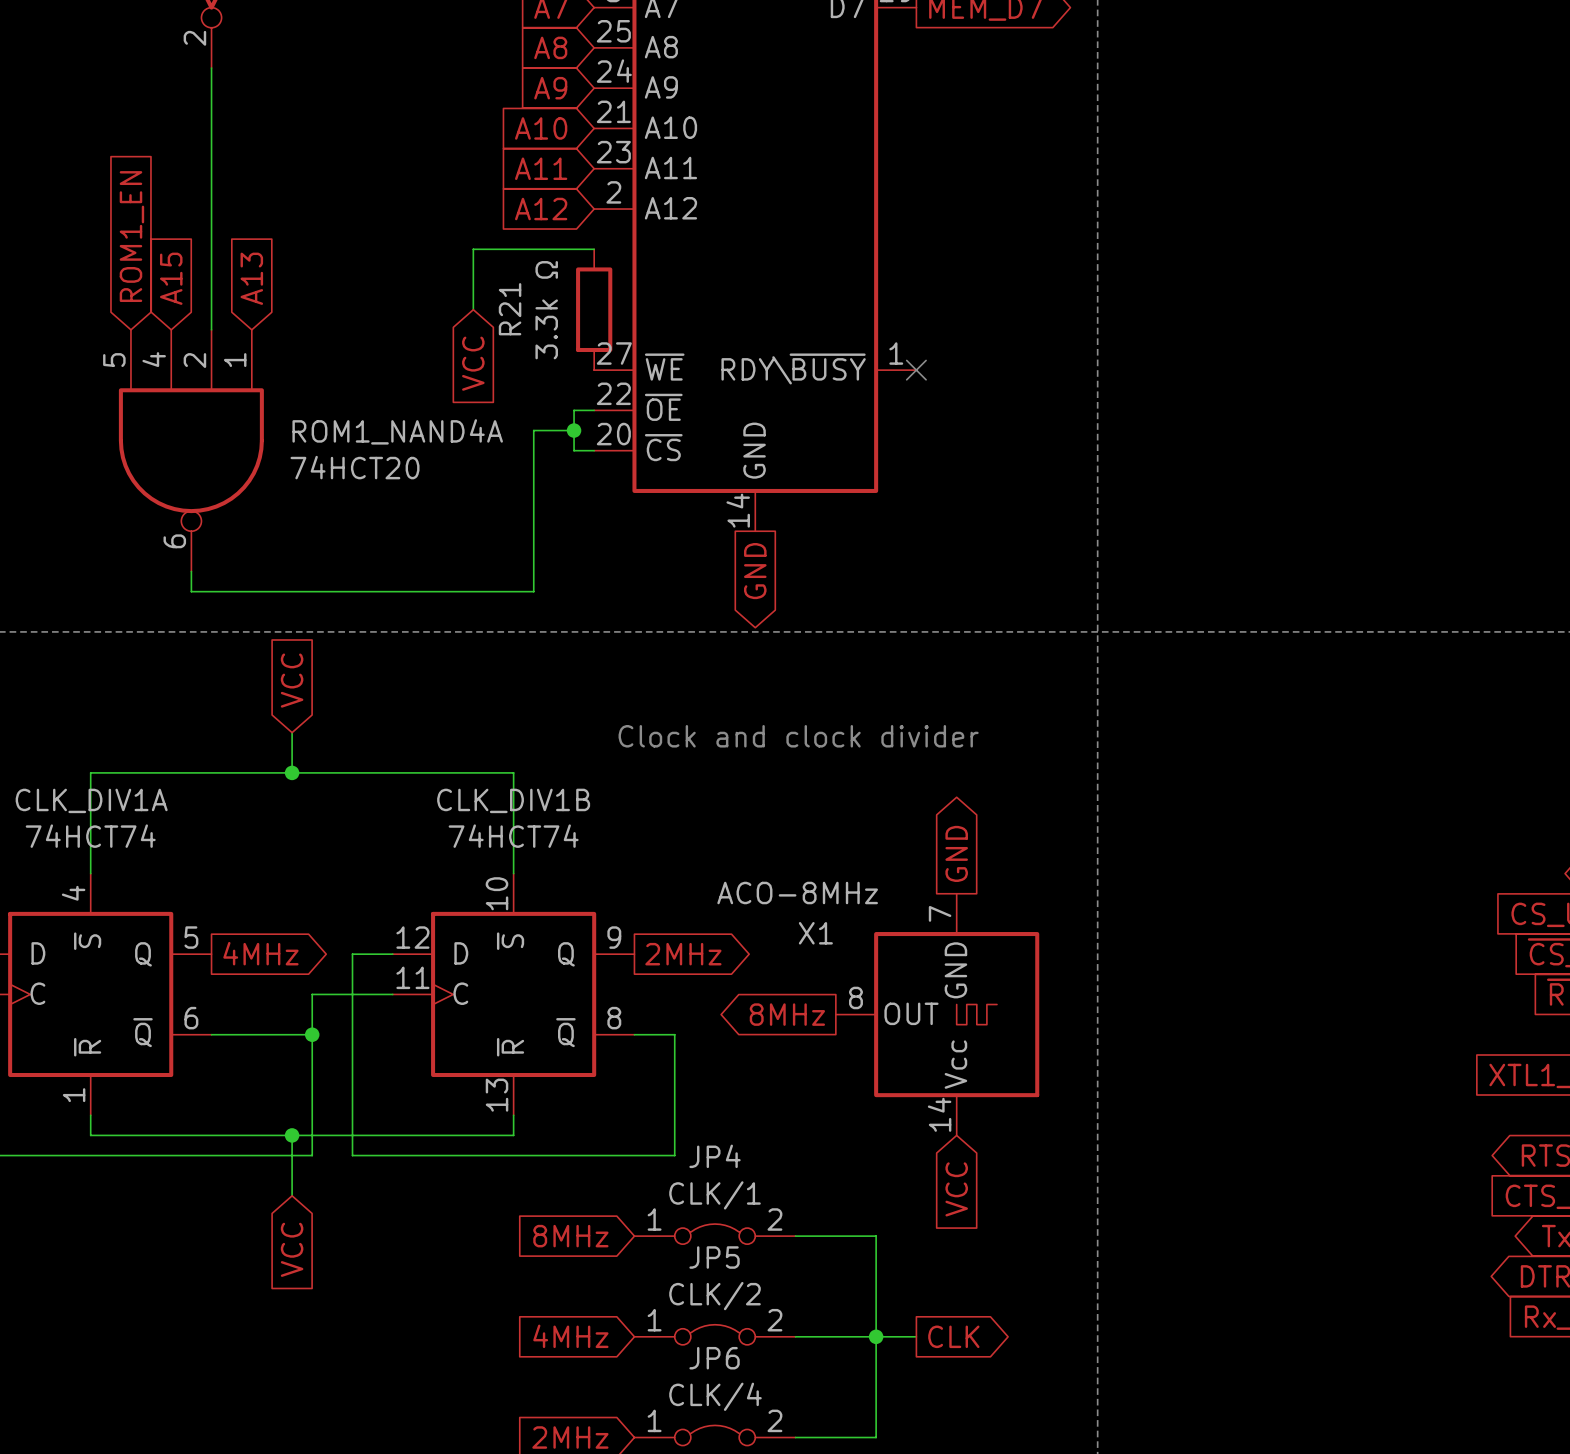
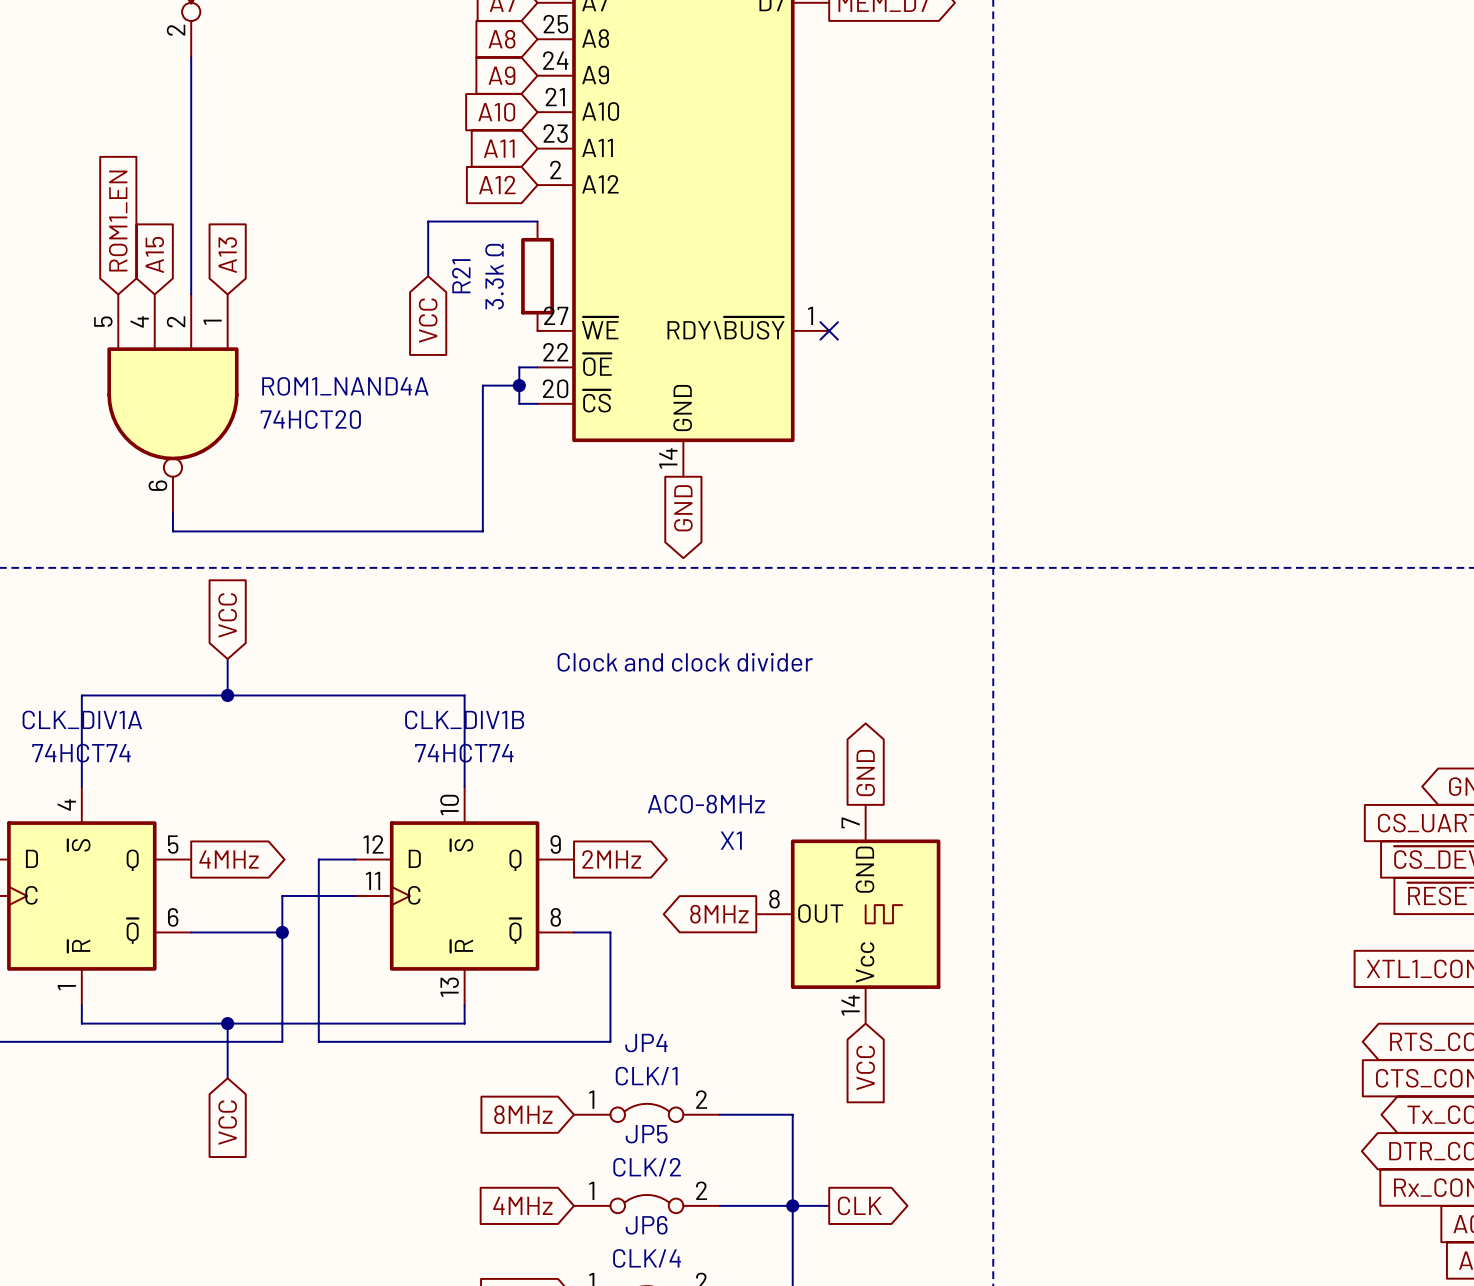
global label position: VCC (292, 680) -> VCC (227, 615)
wire: (292, 732) (292, 772) -> (227, 659) (227, 695)
junction position: (292, 772) -> (227, 695)
wire: (292, 1135) (292, 1195) -> (227, 1023) (227, 1078)
junction position: (292, 1135) -> (227, 1023)
global label position: VCC (292, 1249) -> VCC (227, 1122)

